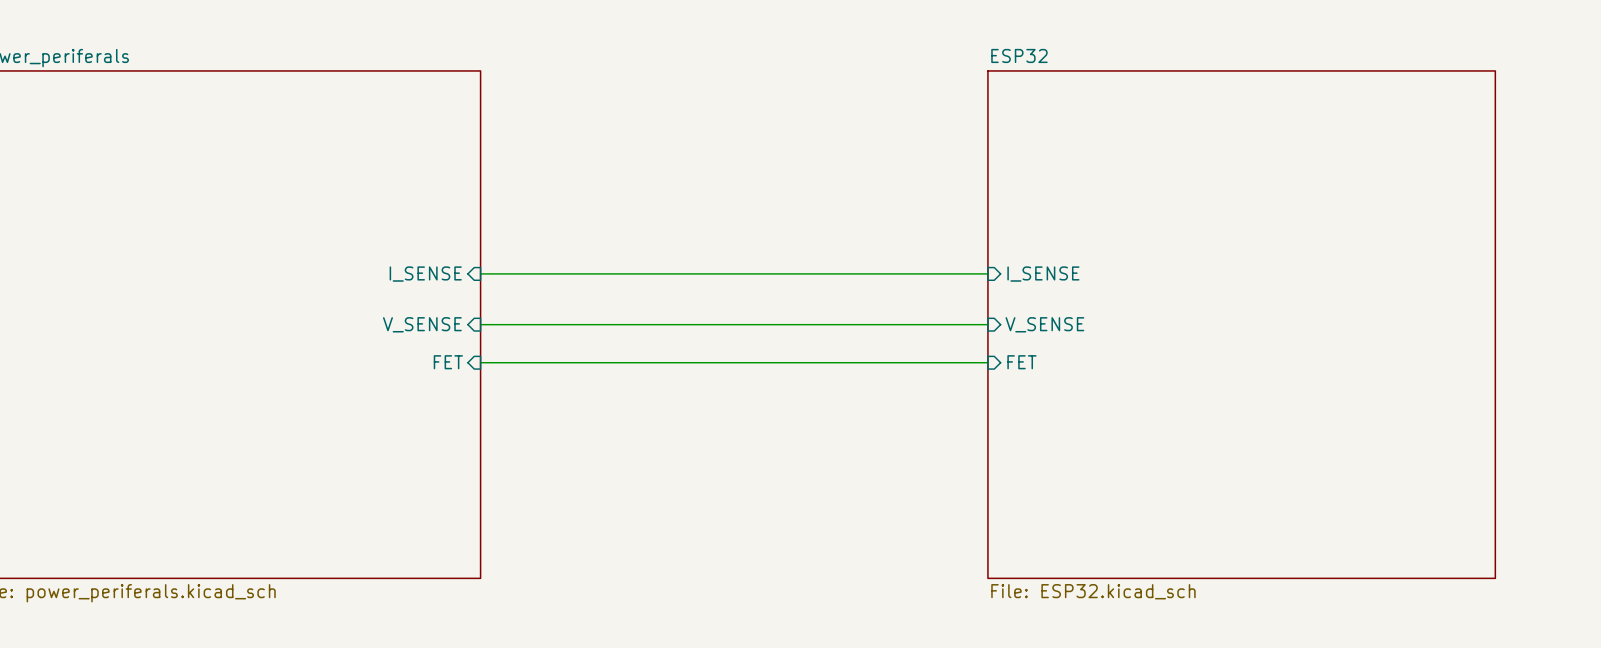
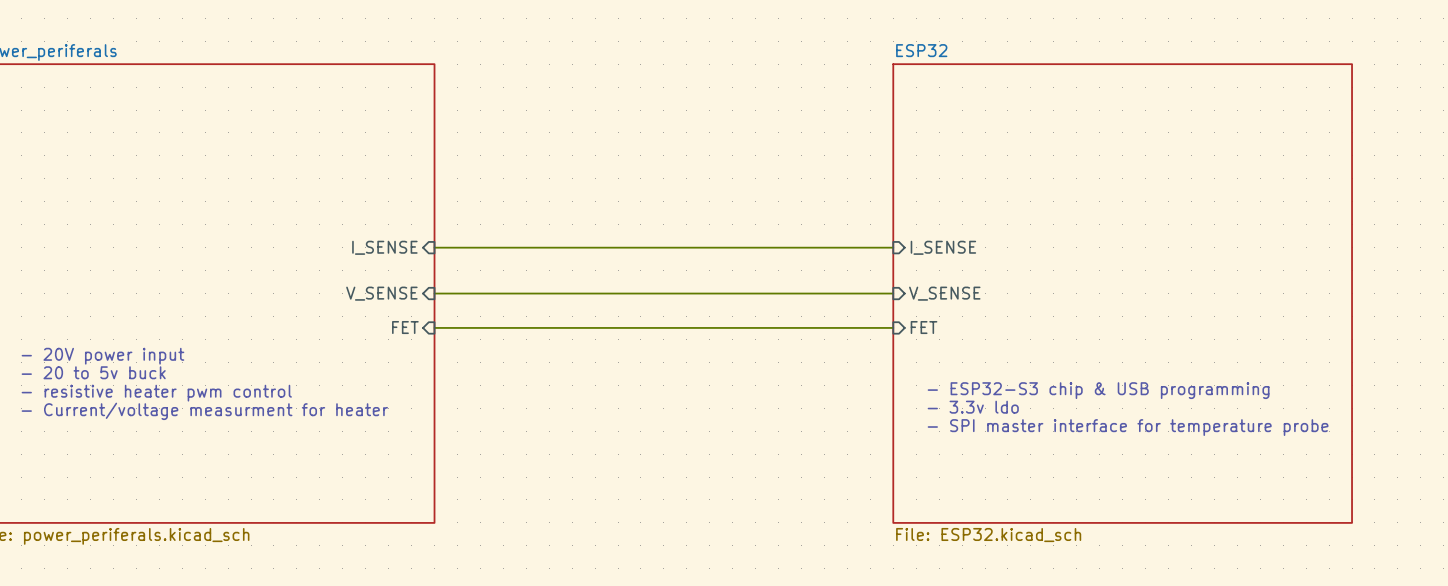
text: none -> - 20V power input (102, 356)
text: none -> - 20 to 5v buck (93, 372)
text: none -> - ESP32-S3 chip & USB programming (1098, 390)
text: none -> - resistive heater pwm control (156, 393)
text: none -> - 3.3v ldo (973, 407)
text: none -> - Current/voltage measurment for heater (204, 411)
text: none -> - SPI master interface for temperature probe (1128, 427)

